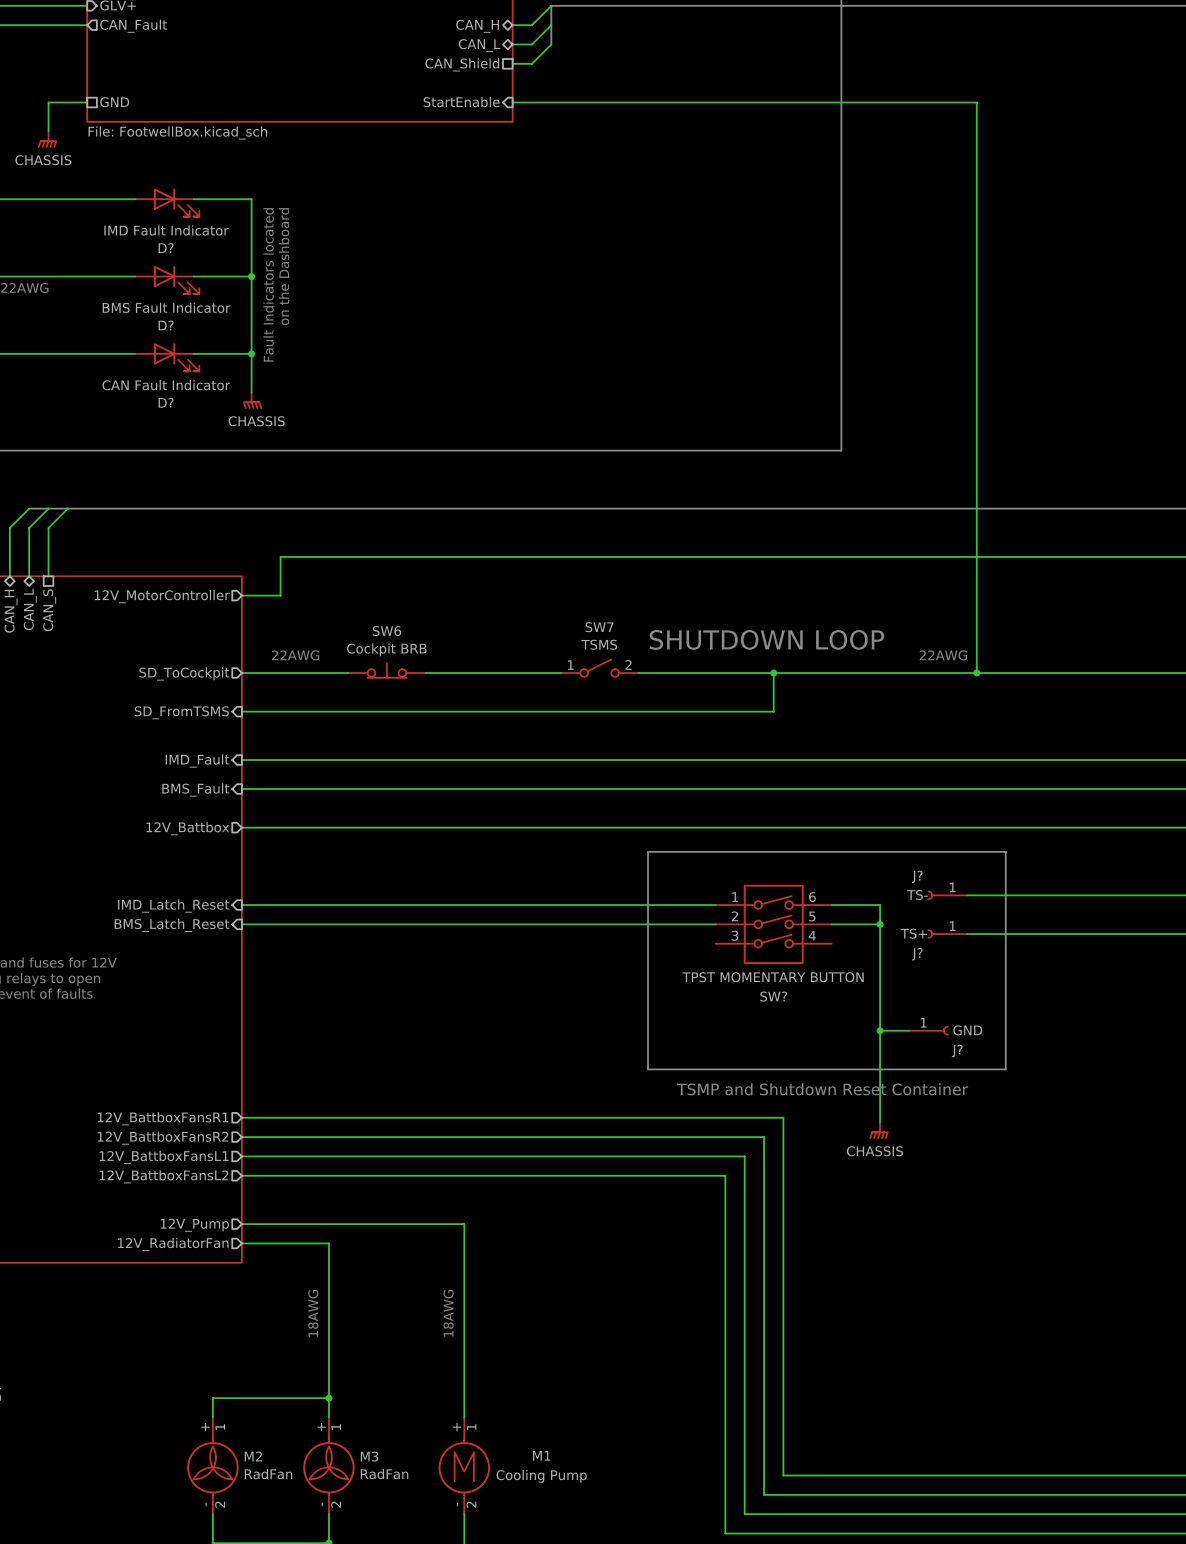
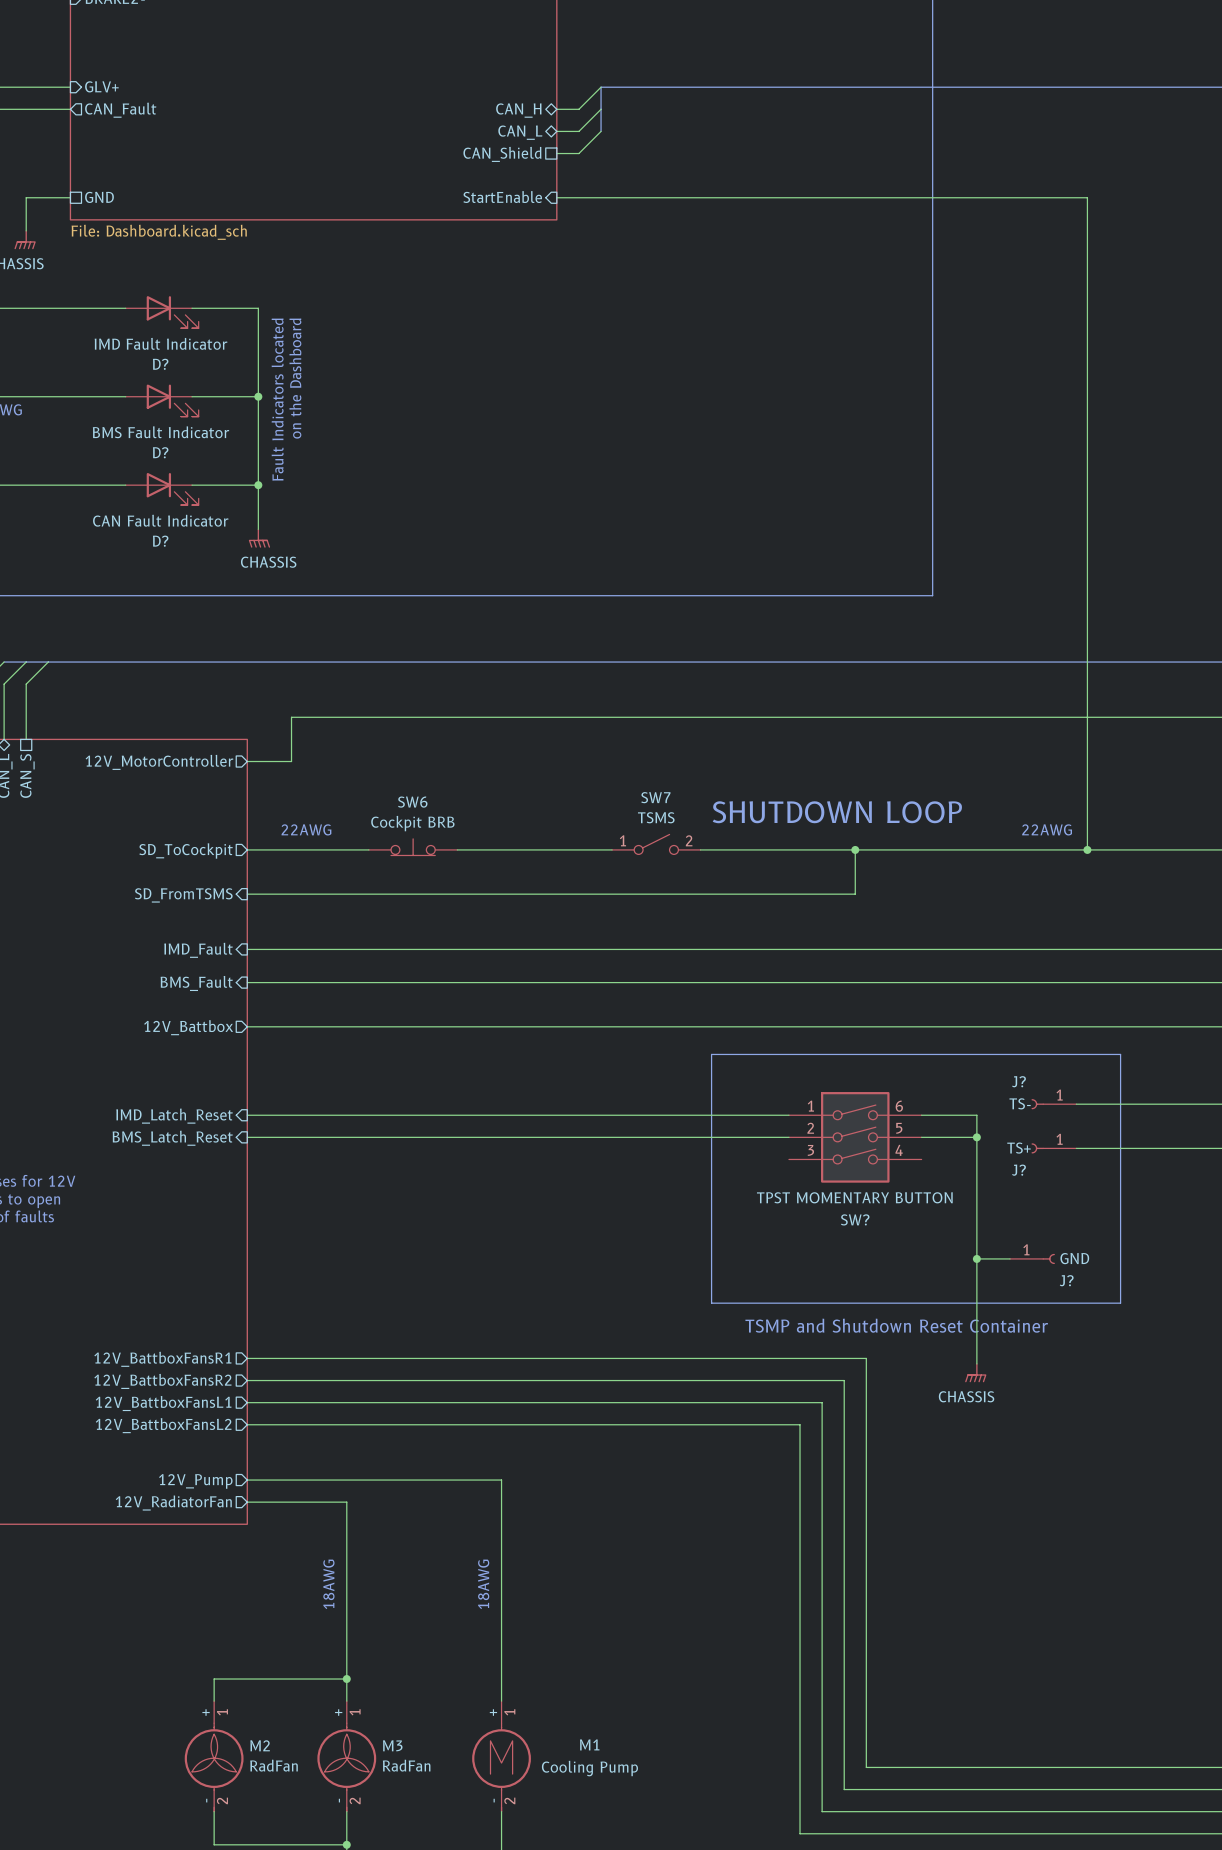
sheet value: File: FootwellBox.kicad_sch (177, 132) -> File: Dashboard.kicad_sch (159, 232)

